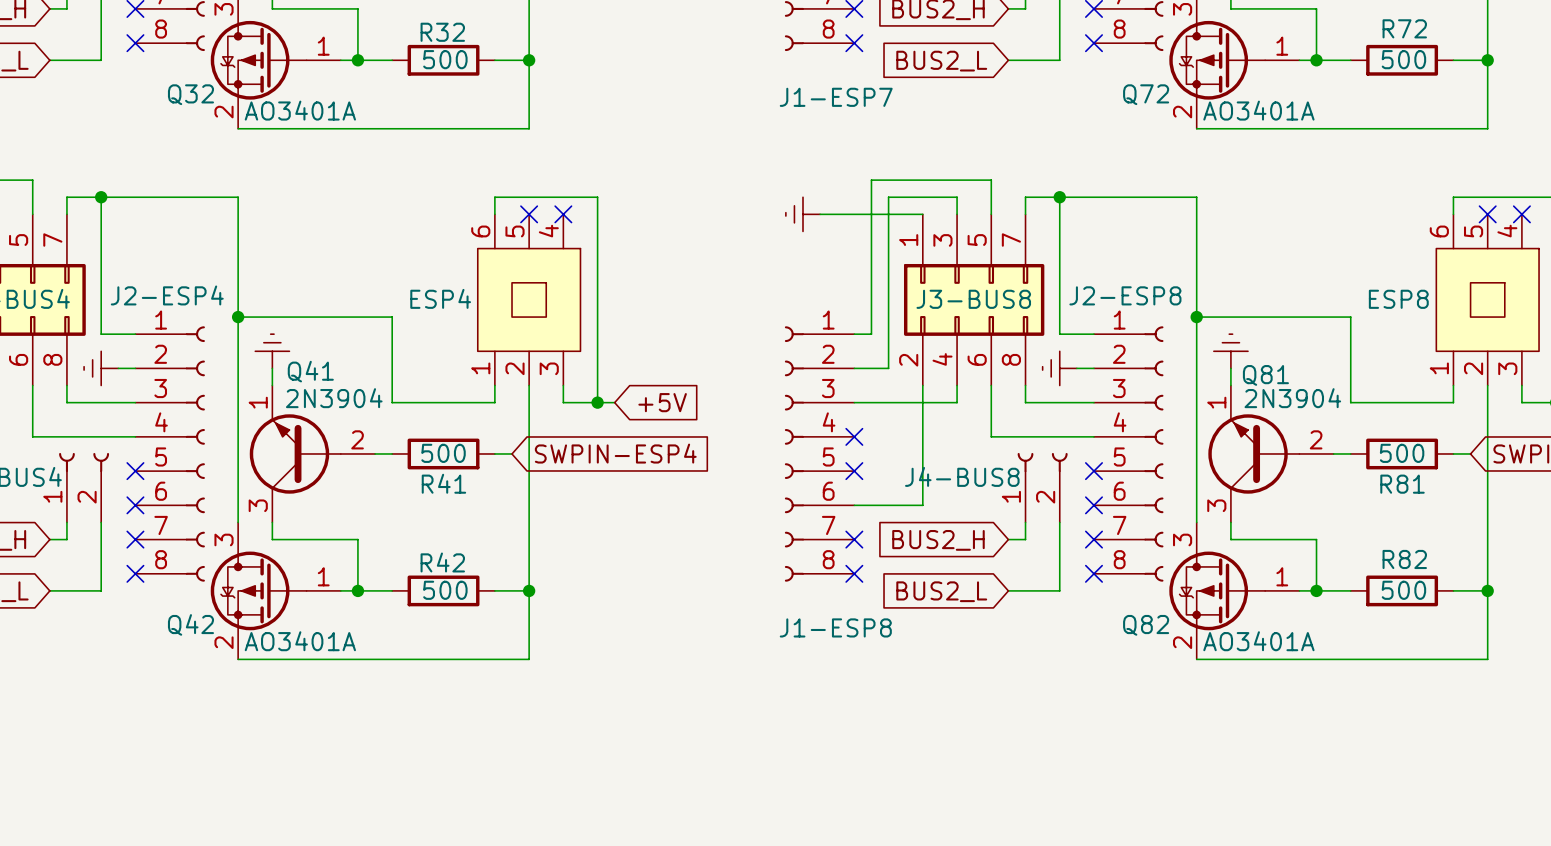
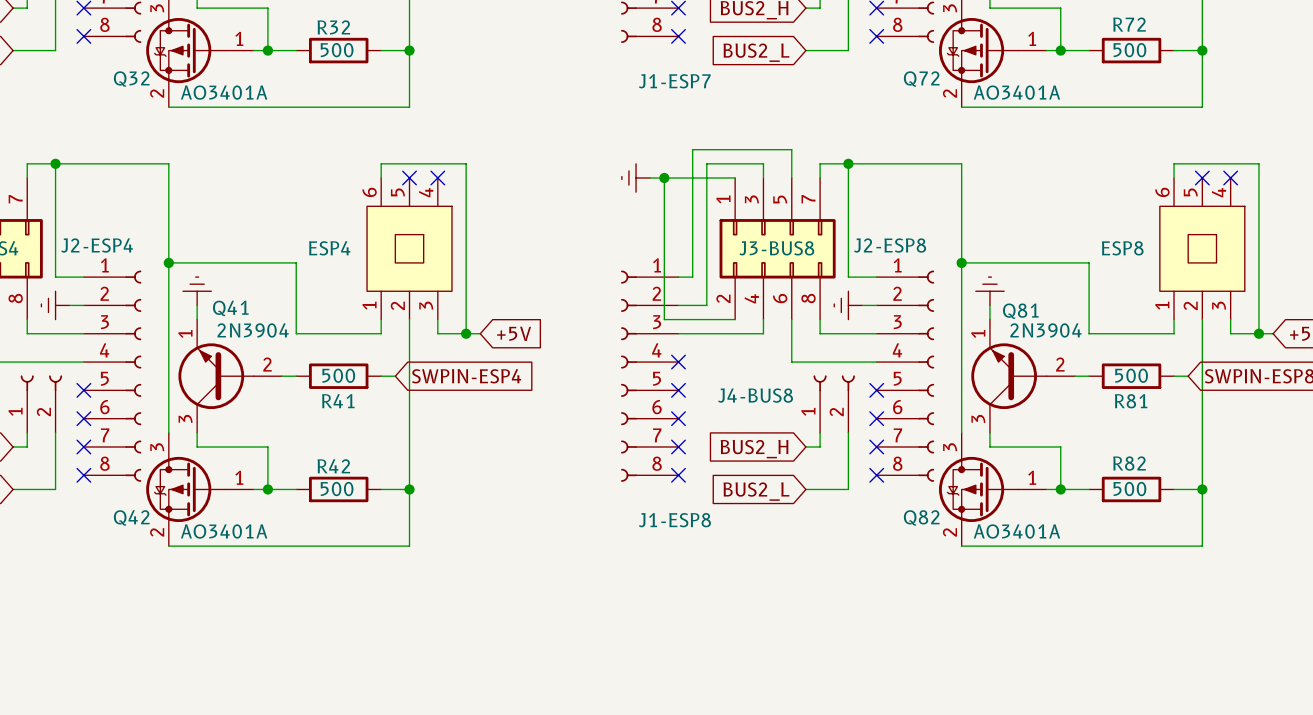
junction: none -> (664, 177)
wire: (922, 385) (922, 505) (854, 505) -> (735, 319) (664, 319) (664, 177)
no-connect mark: none -> (678, 418)

